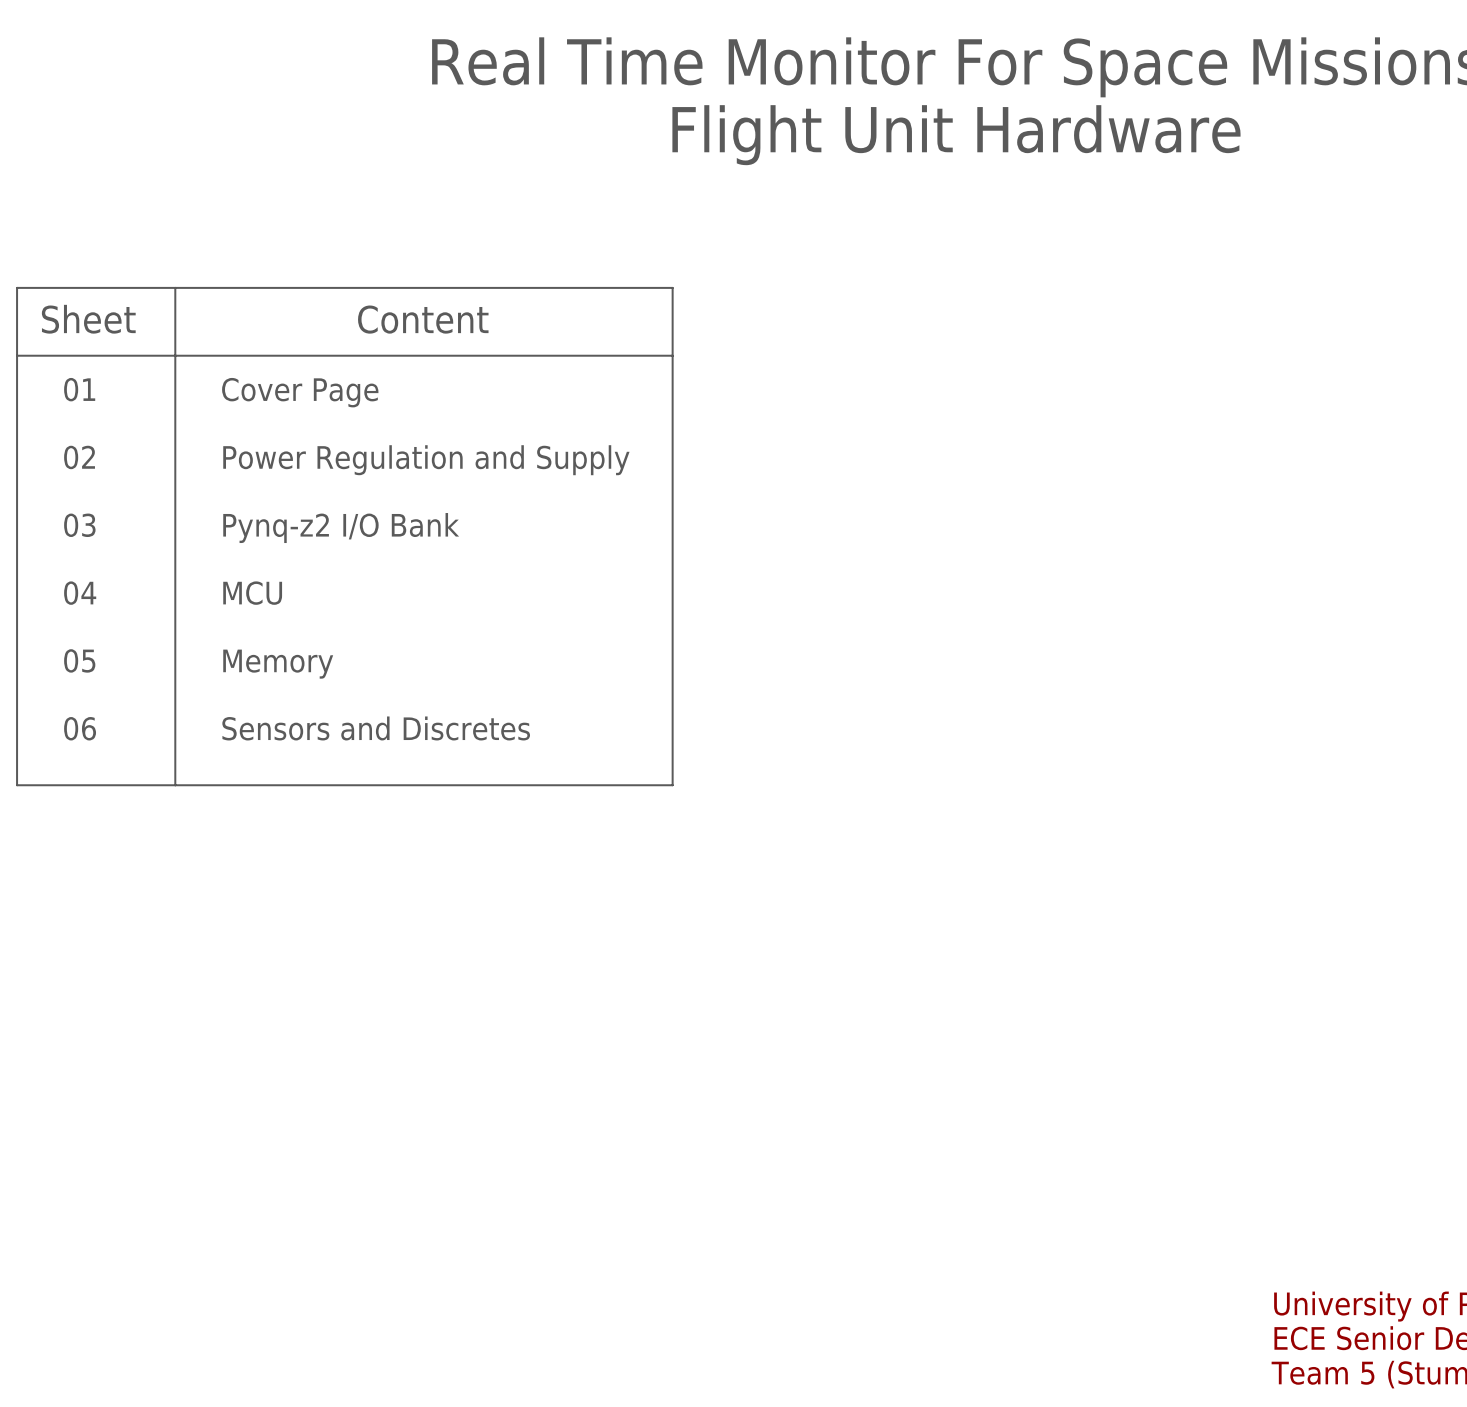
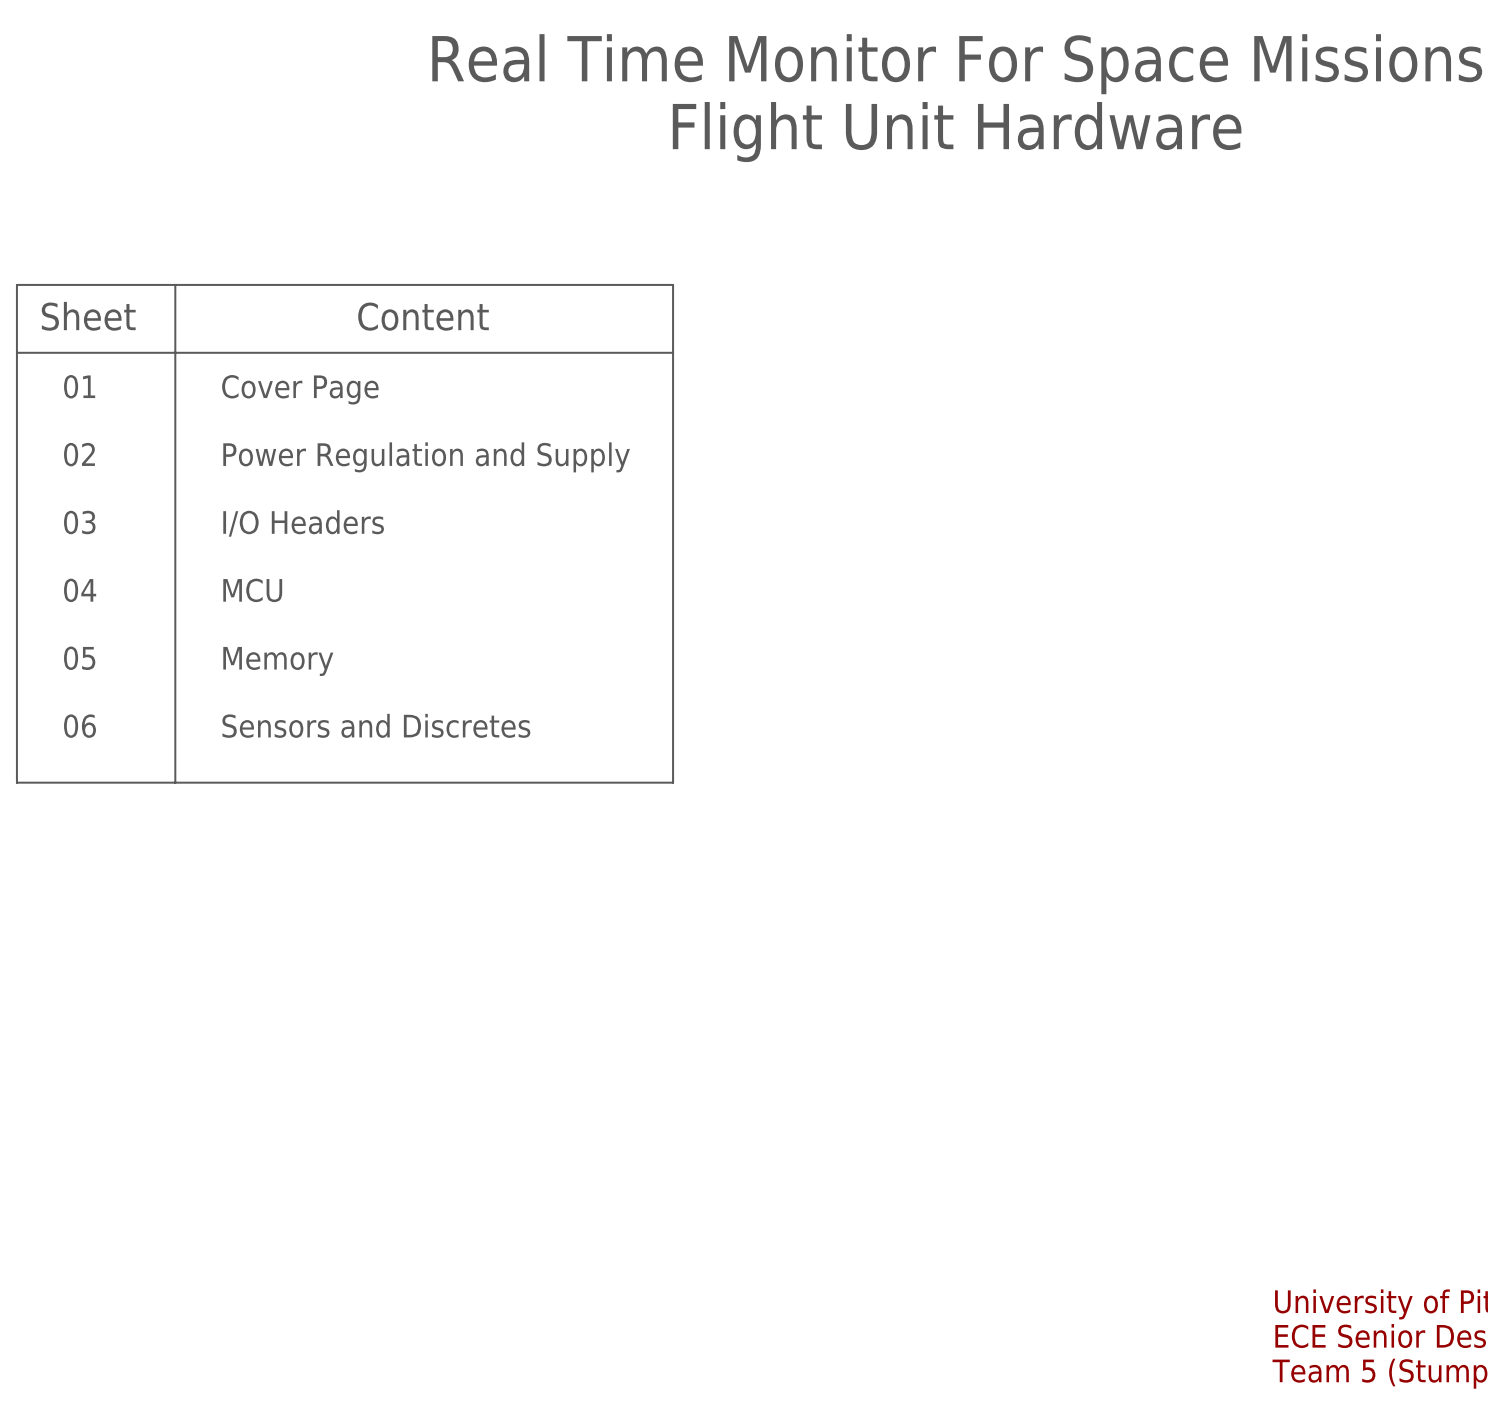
text: Pynq-z2 I/O Bank (341, 528) -> I/O Headers (303, 523)

